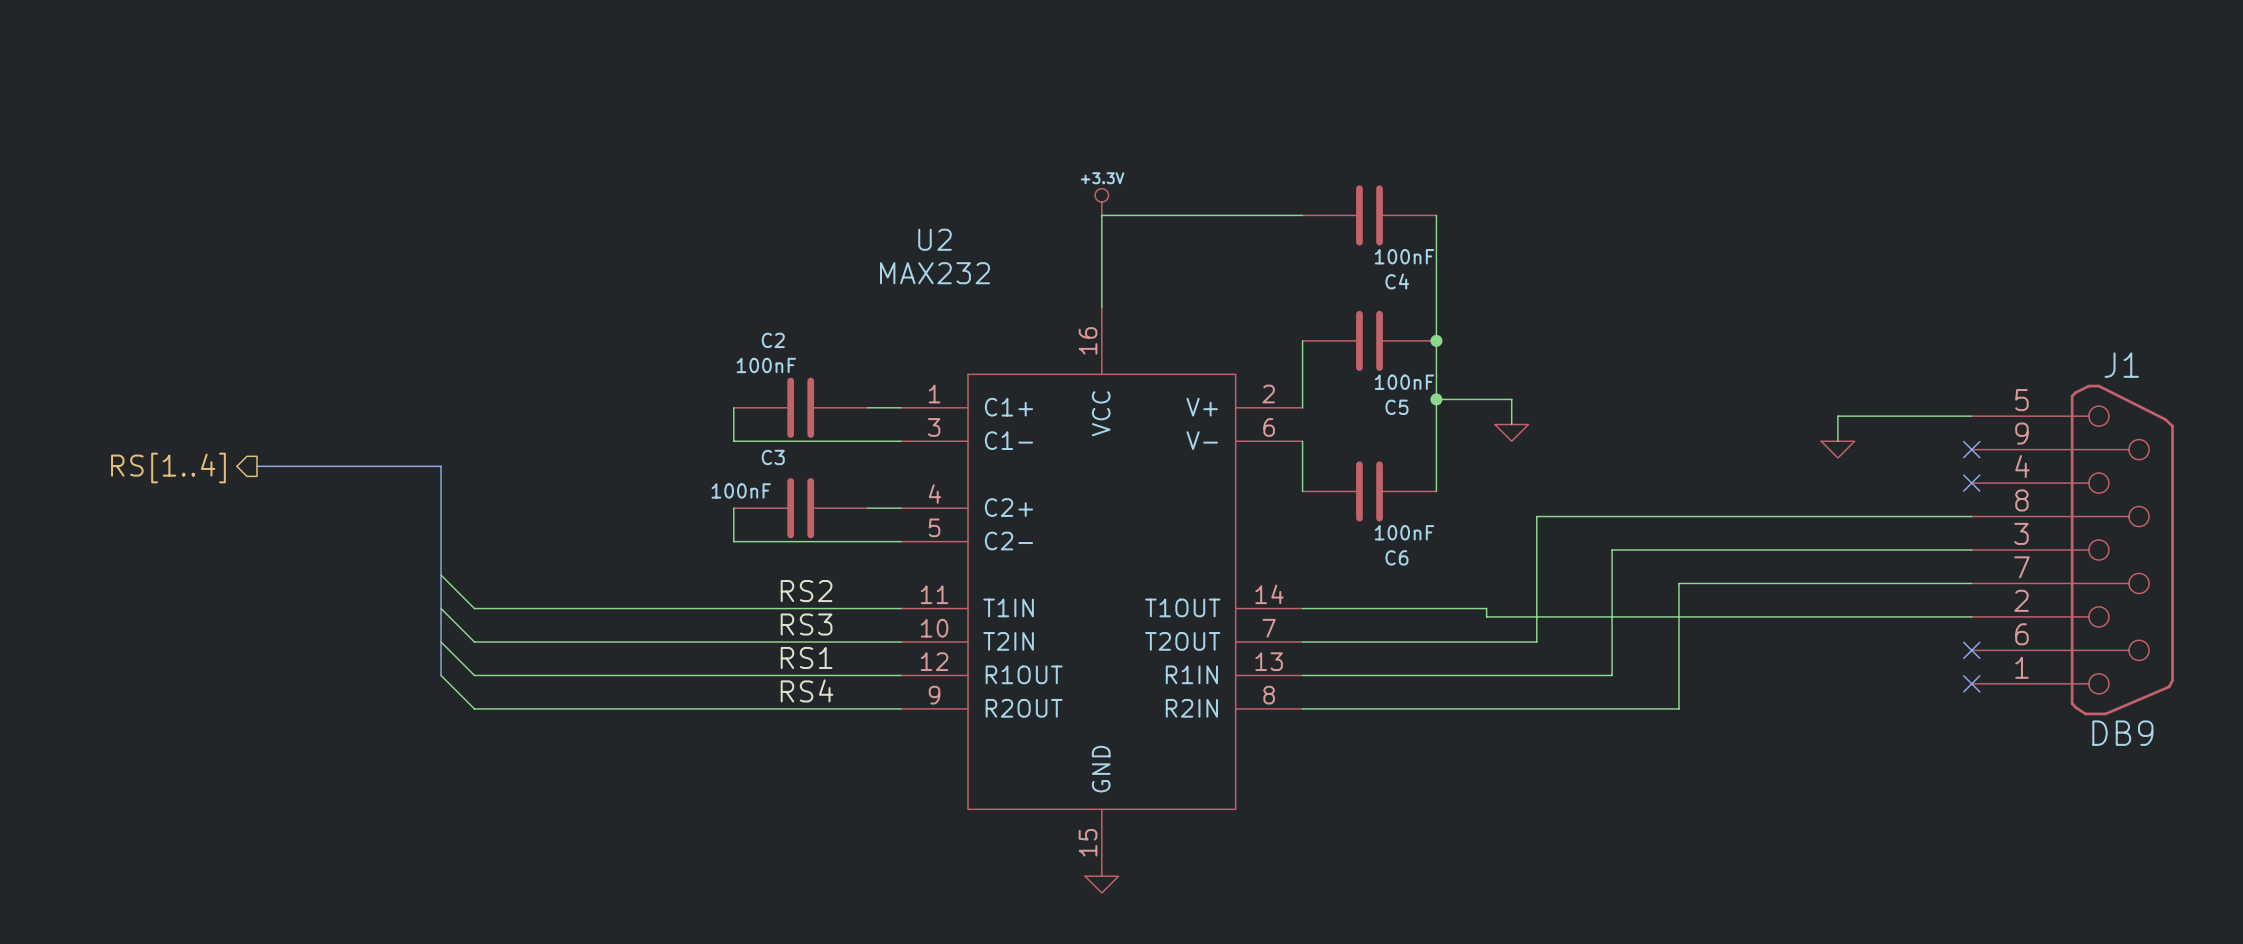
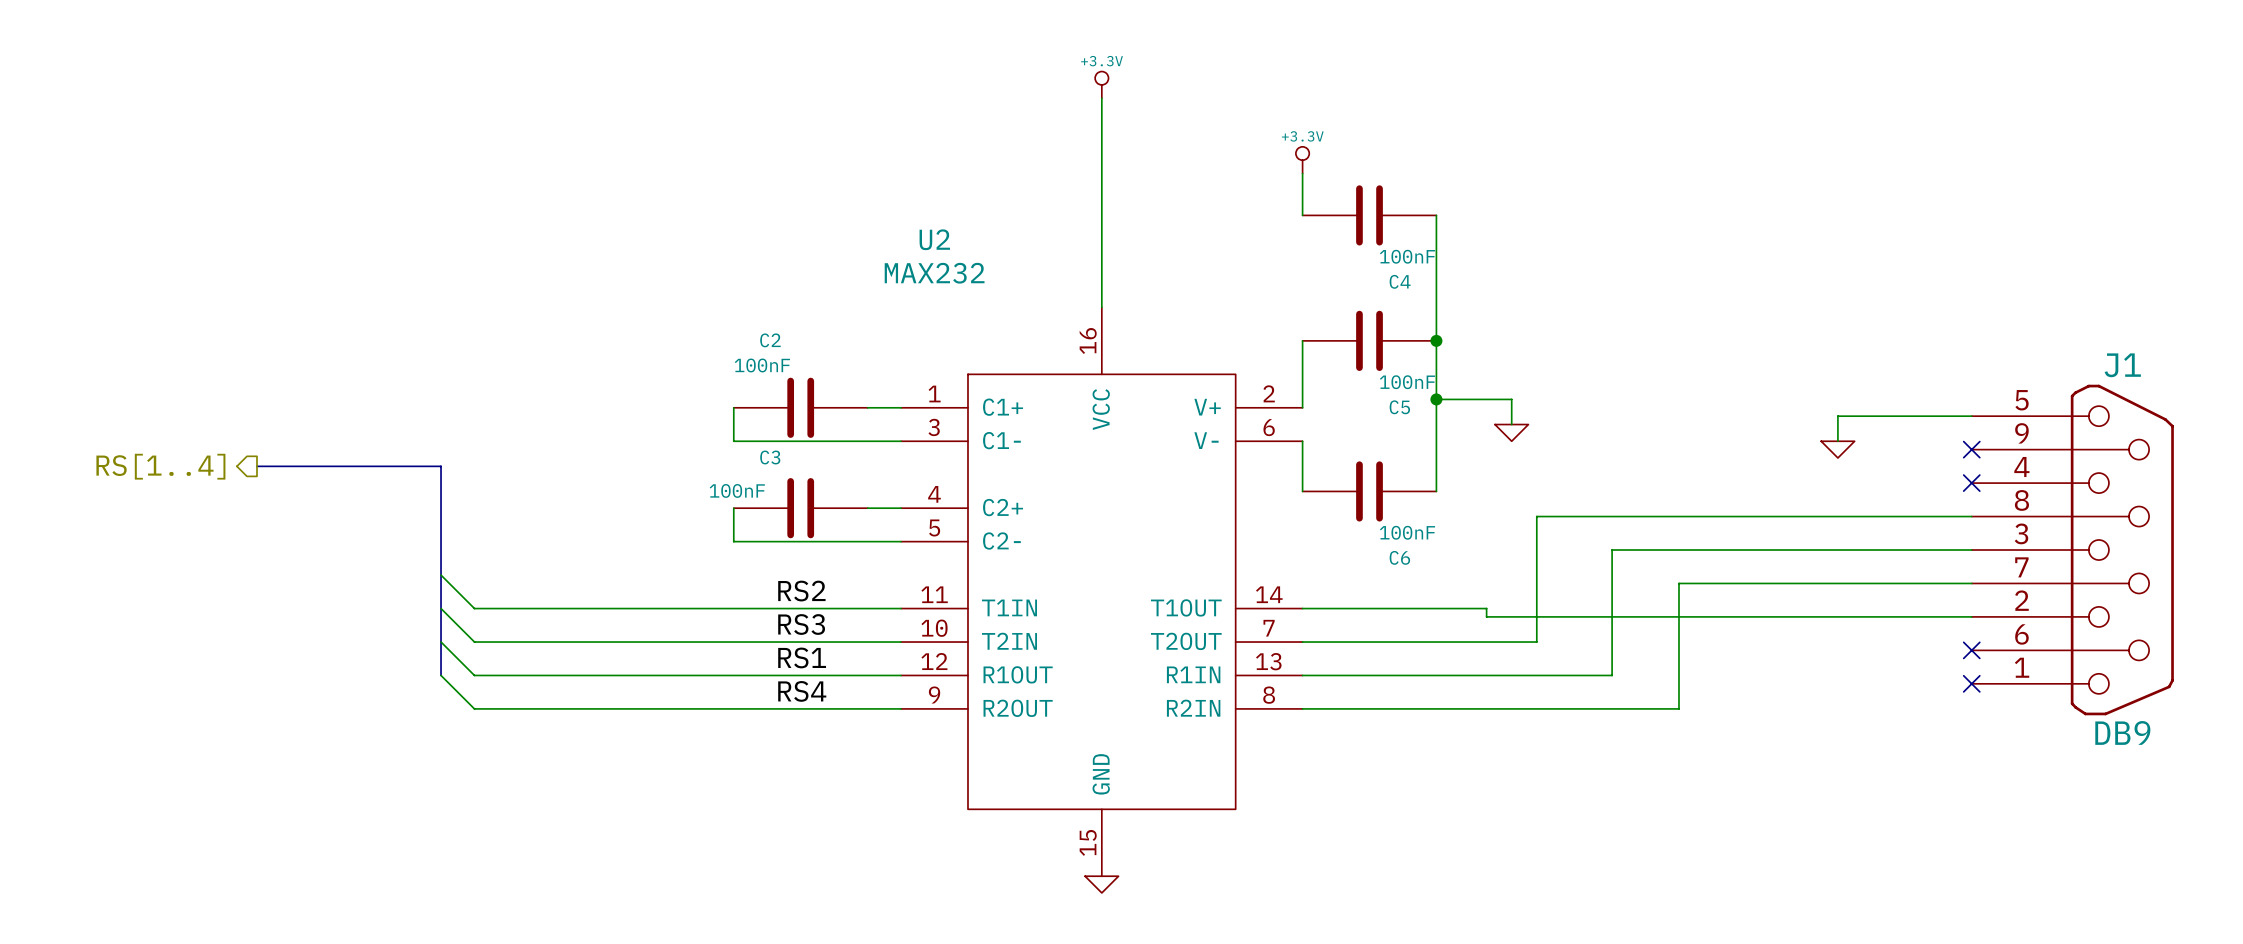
power symbol: none -> +3.3V (1101, 84)
wire: none -> (1101, 98) (1101, 215)
power symbol: none -> +3.3V (1302, 160)
power symbol: +3.3V (1101, 202) -> none
wire: (1101, 215) (1302, 215) -> (1302, 173) (1302, 215)

